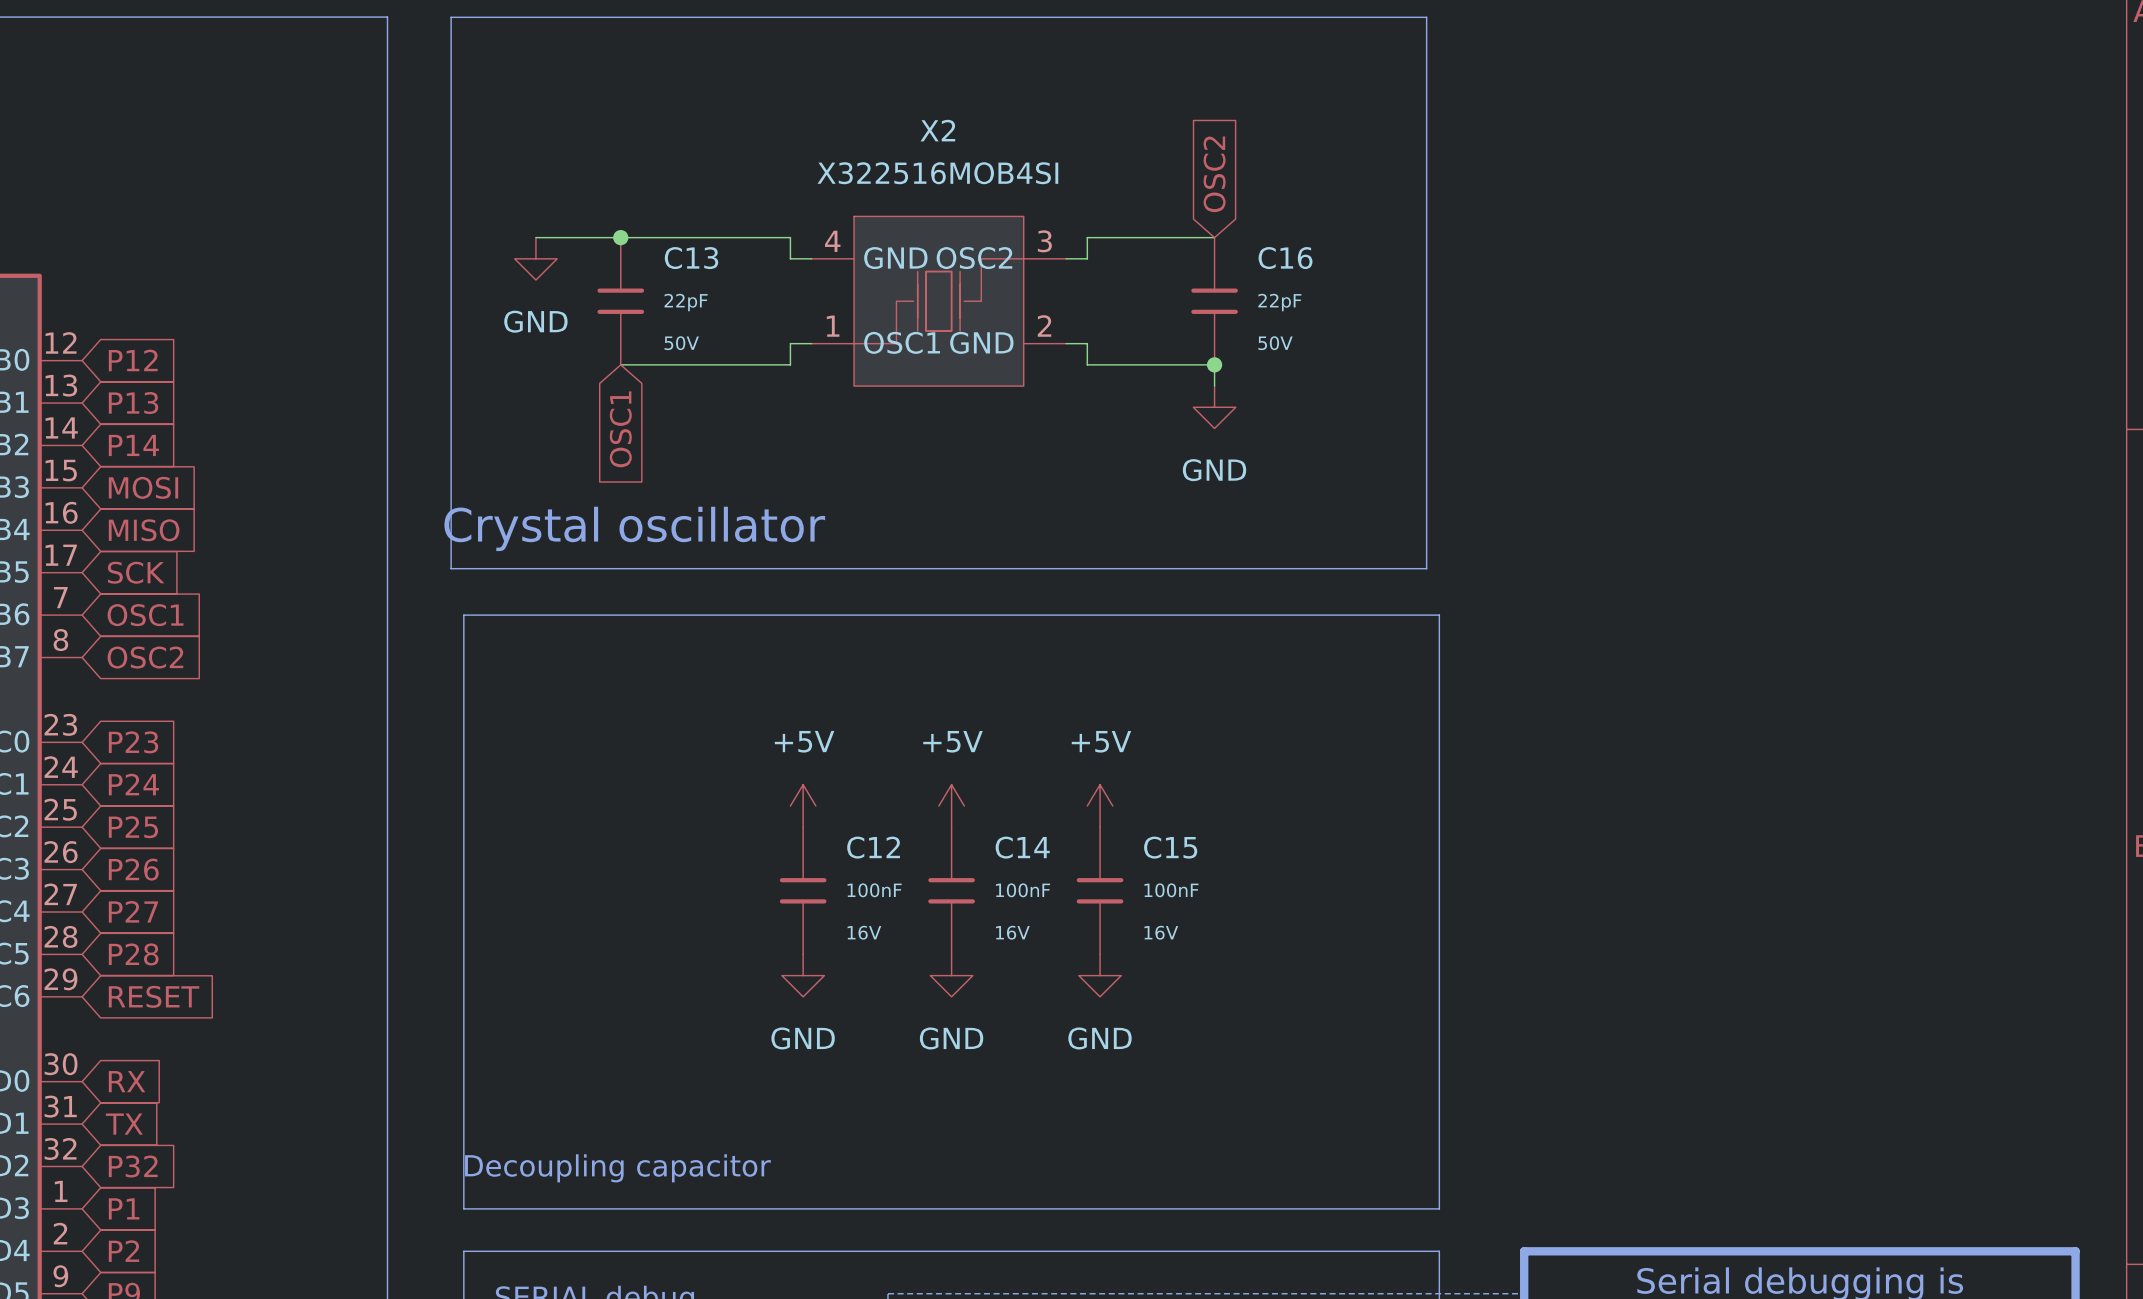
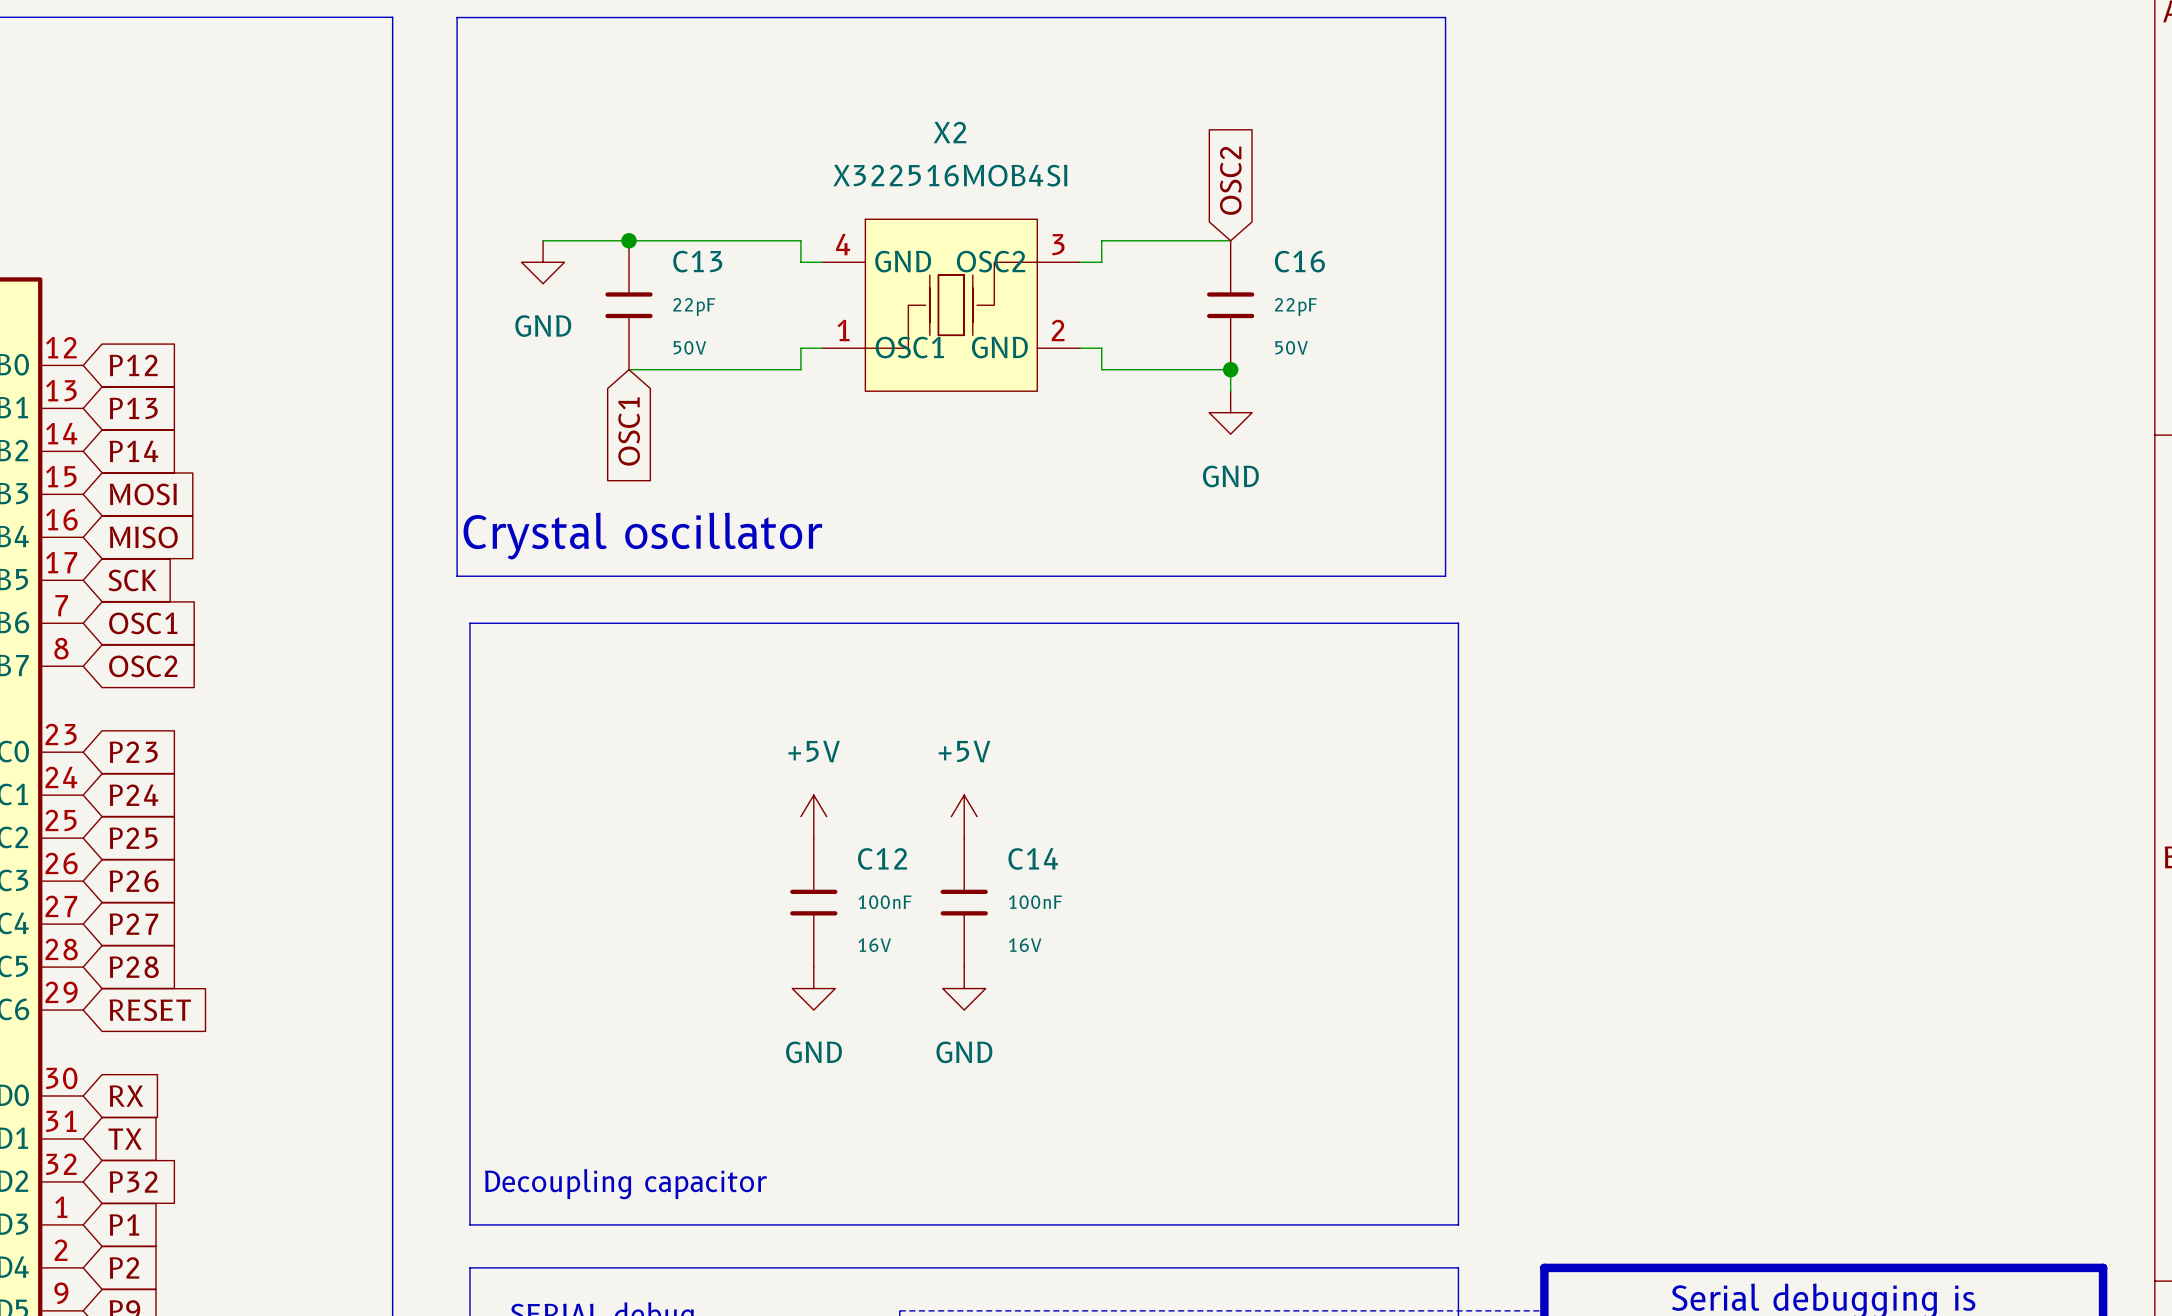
power symbol: +5V (1100, 805) -> none
C15: 100nF (1100, 890) -> none
power symbol: GND (1100, 975) -> none

